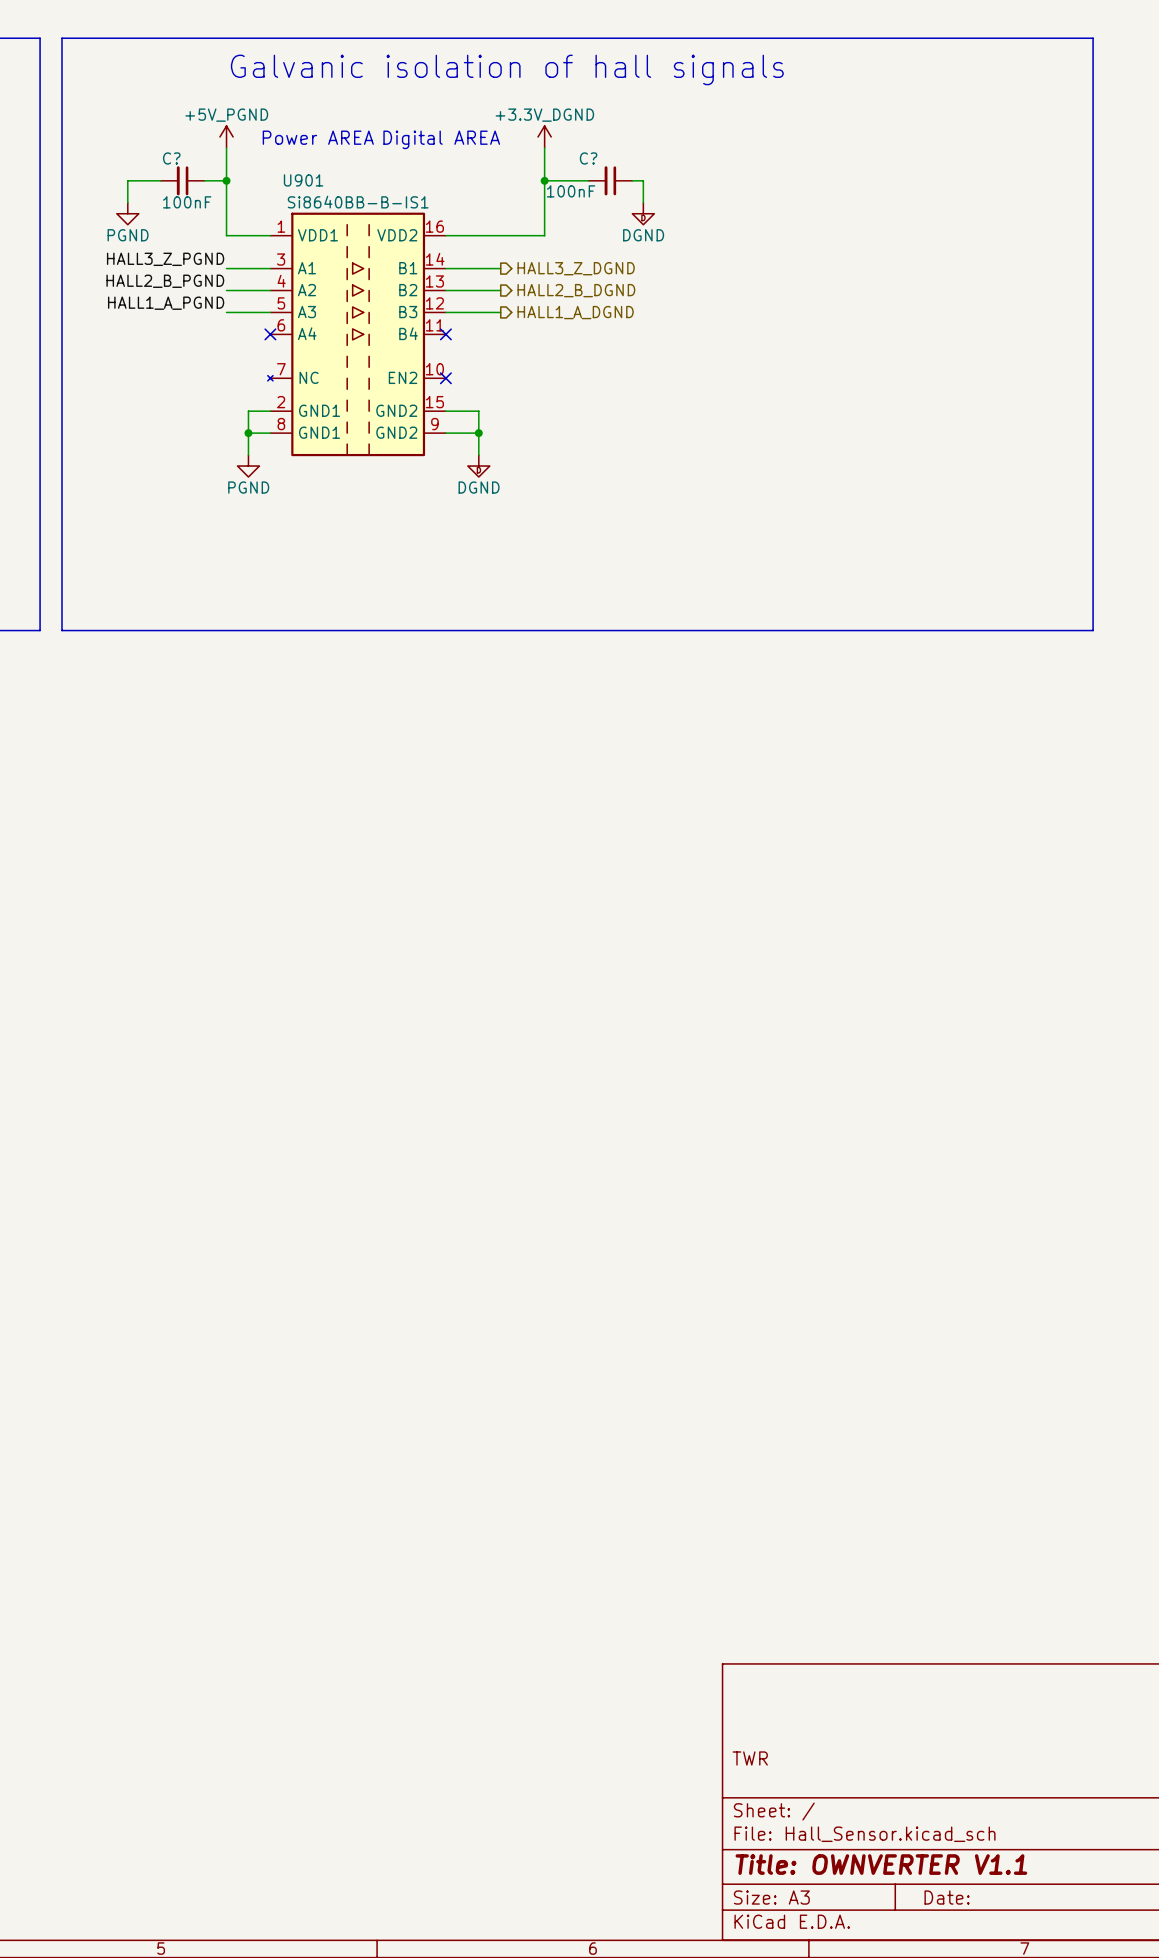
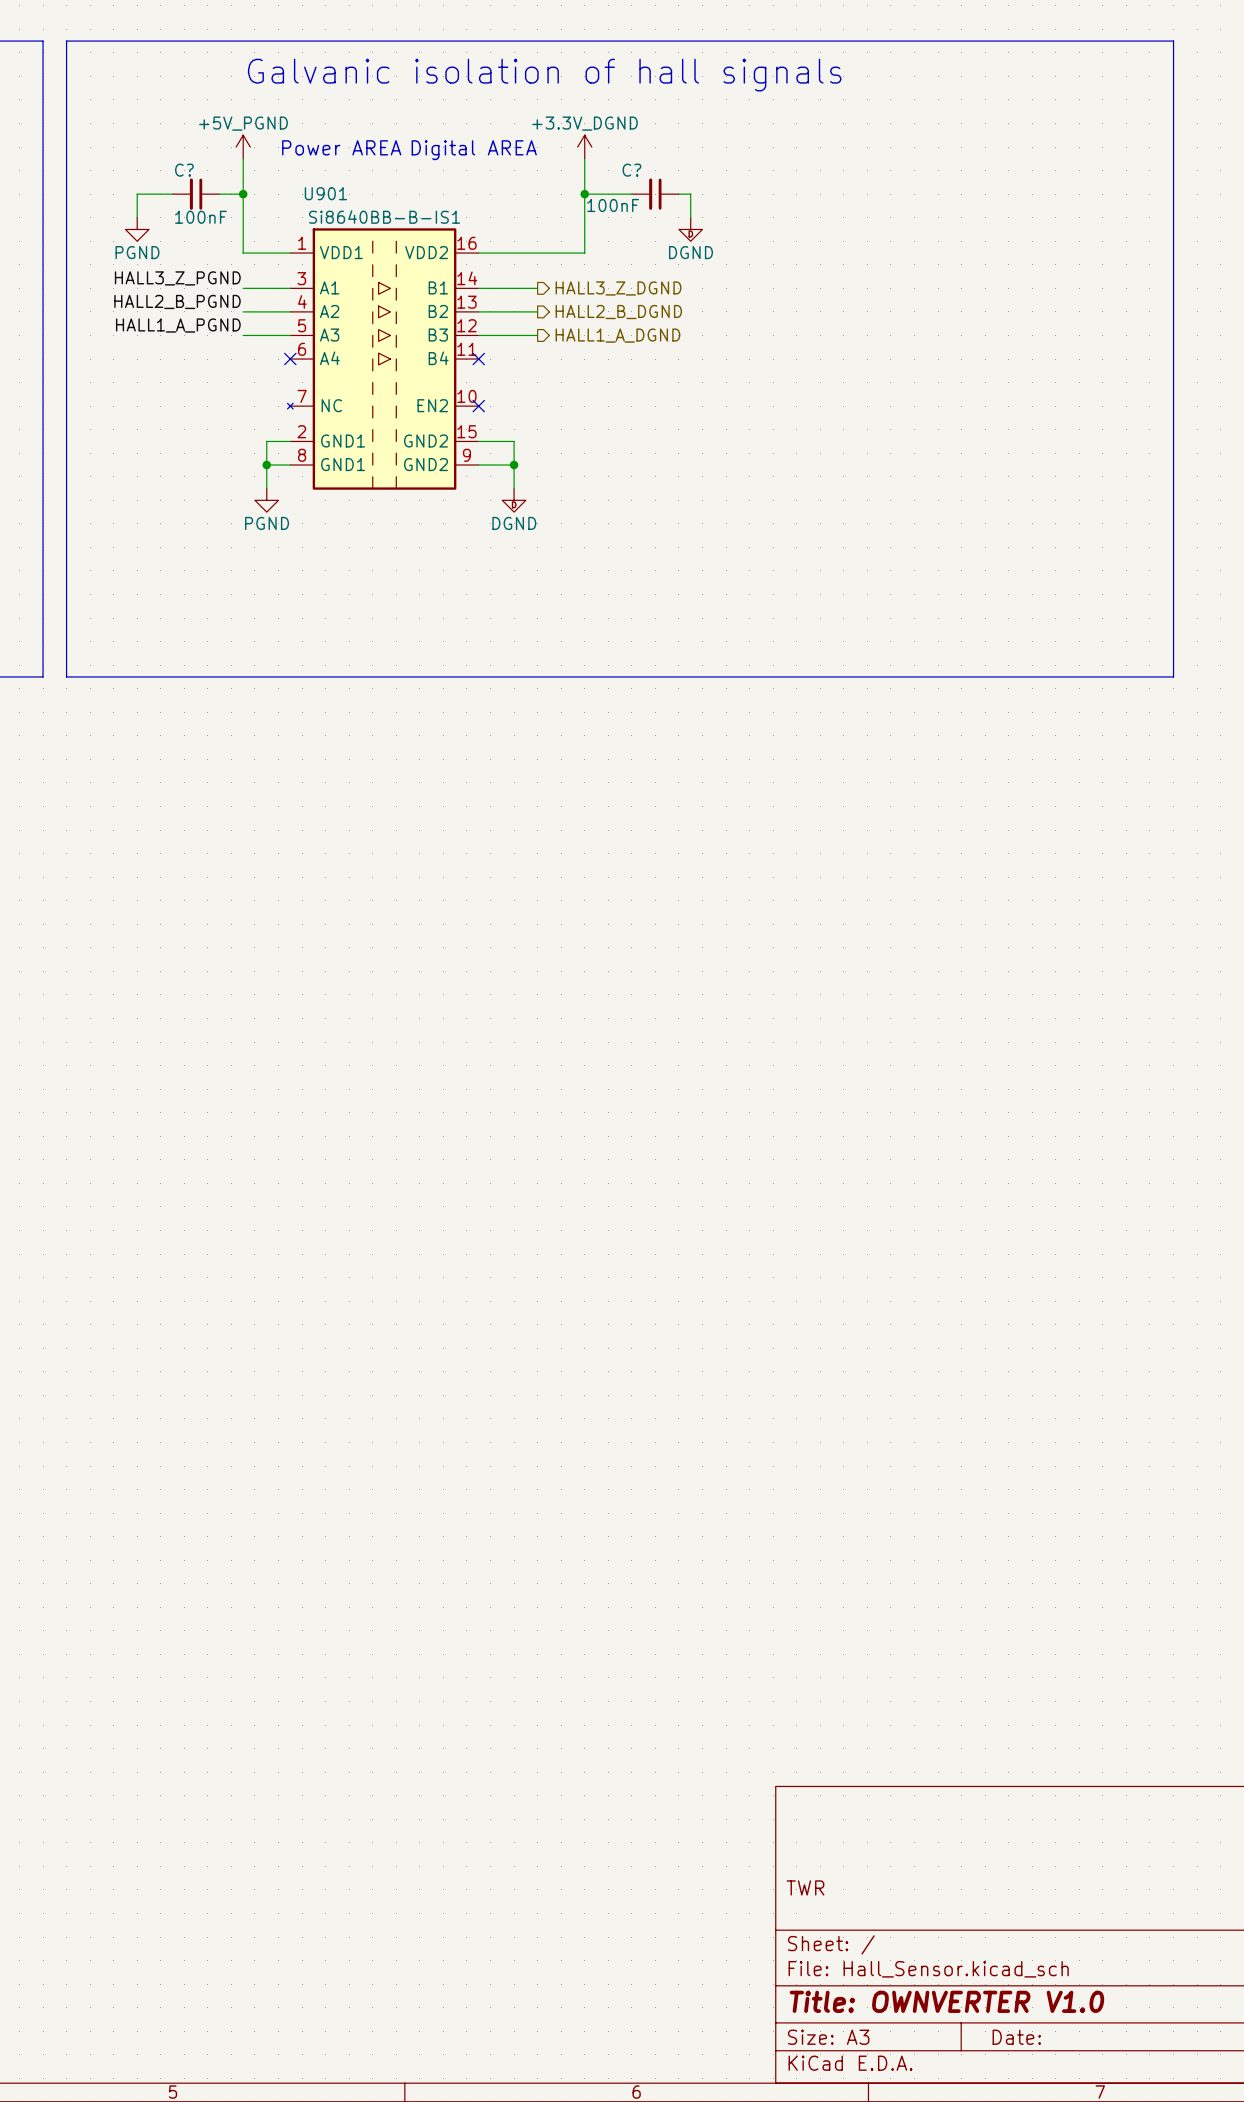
title block: Title: OWNVERTER V1.1 (881, 1864) -> Title: OWNVERTER V1.0 (946, 2001)

